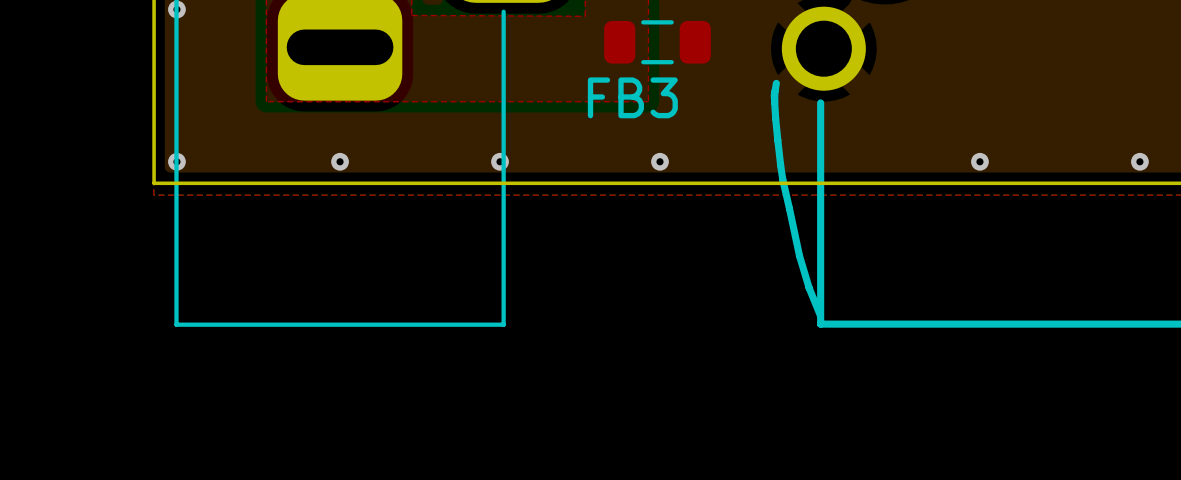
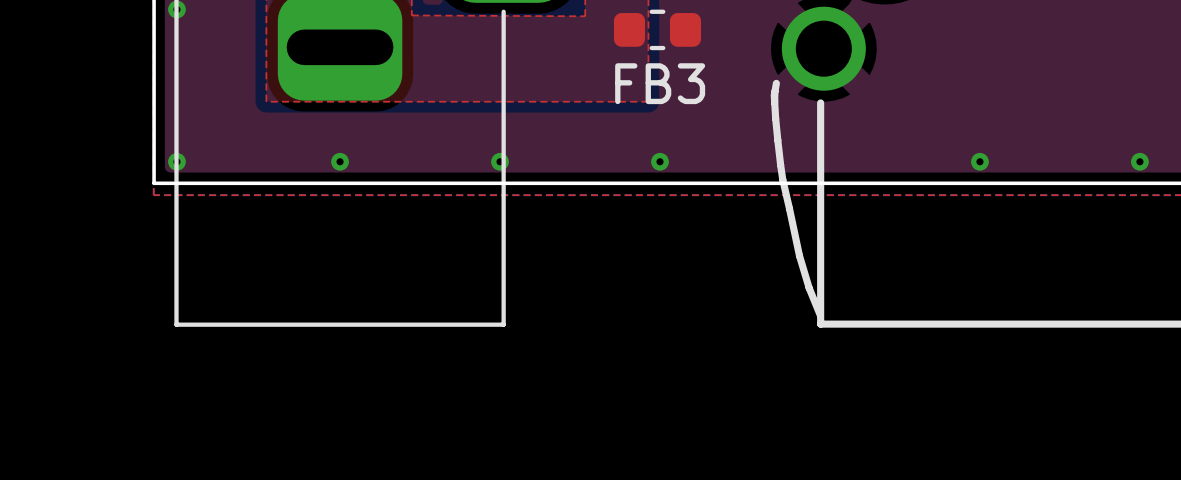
FB3 footprint: [604, 20, 711, 65] -> [613, 9, 702, 51]
FB3 name position: FB3 (632, 97) -> FB3 (660, 83)

